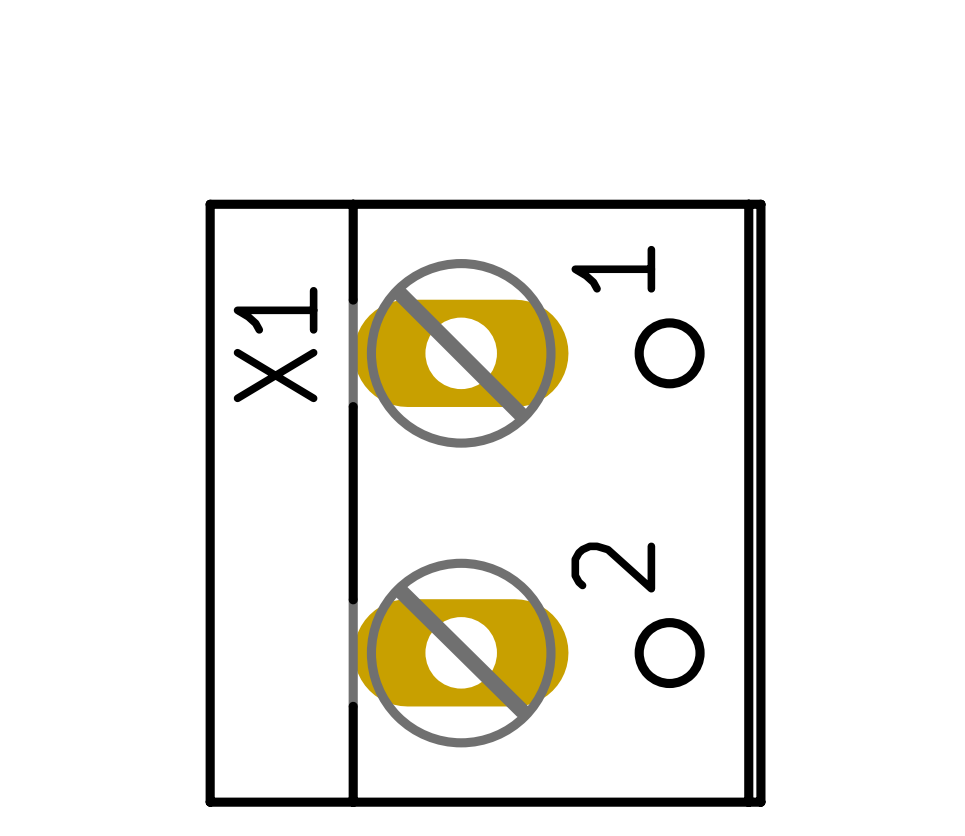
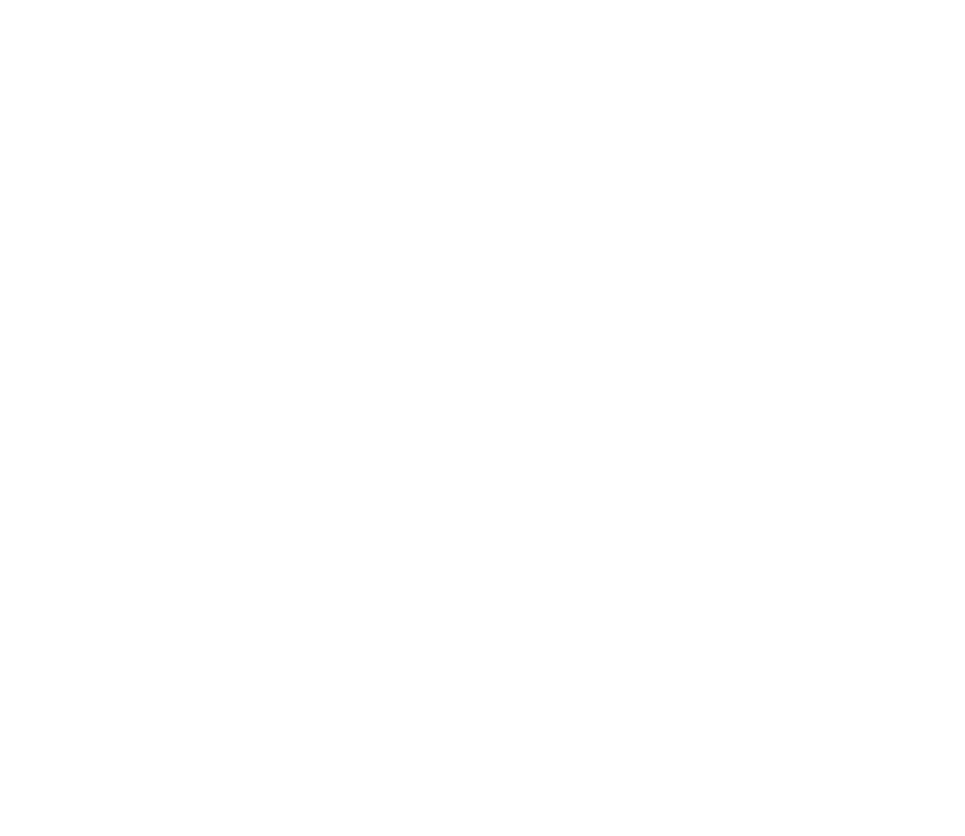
X1: (485, 503) -> none

